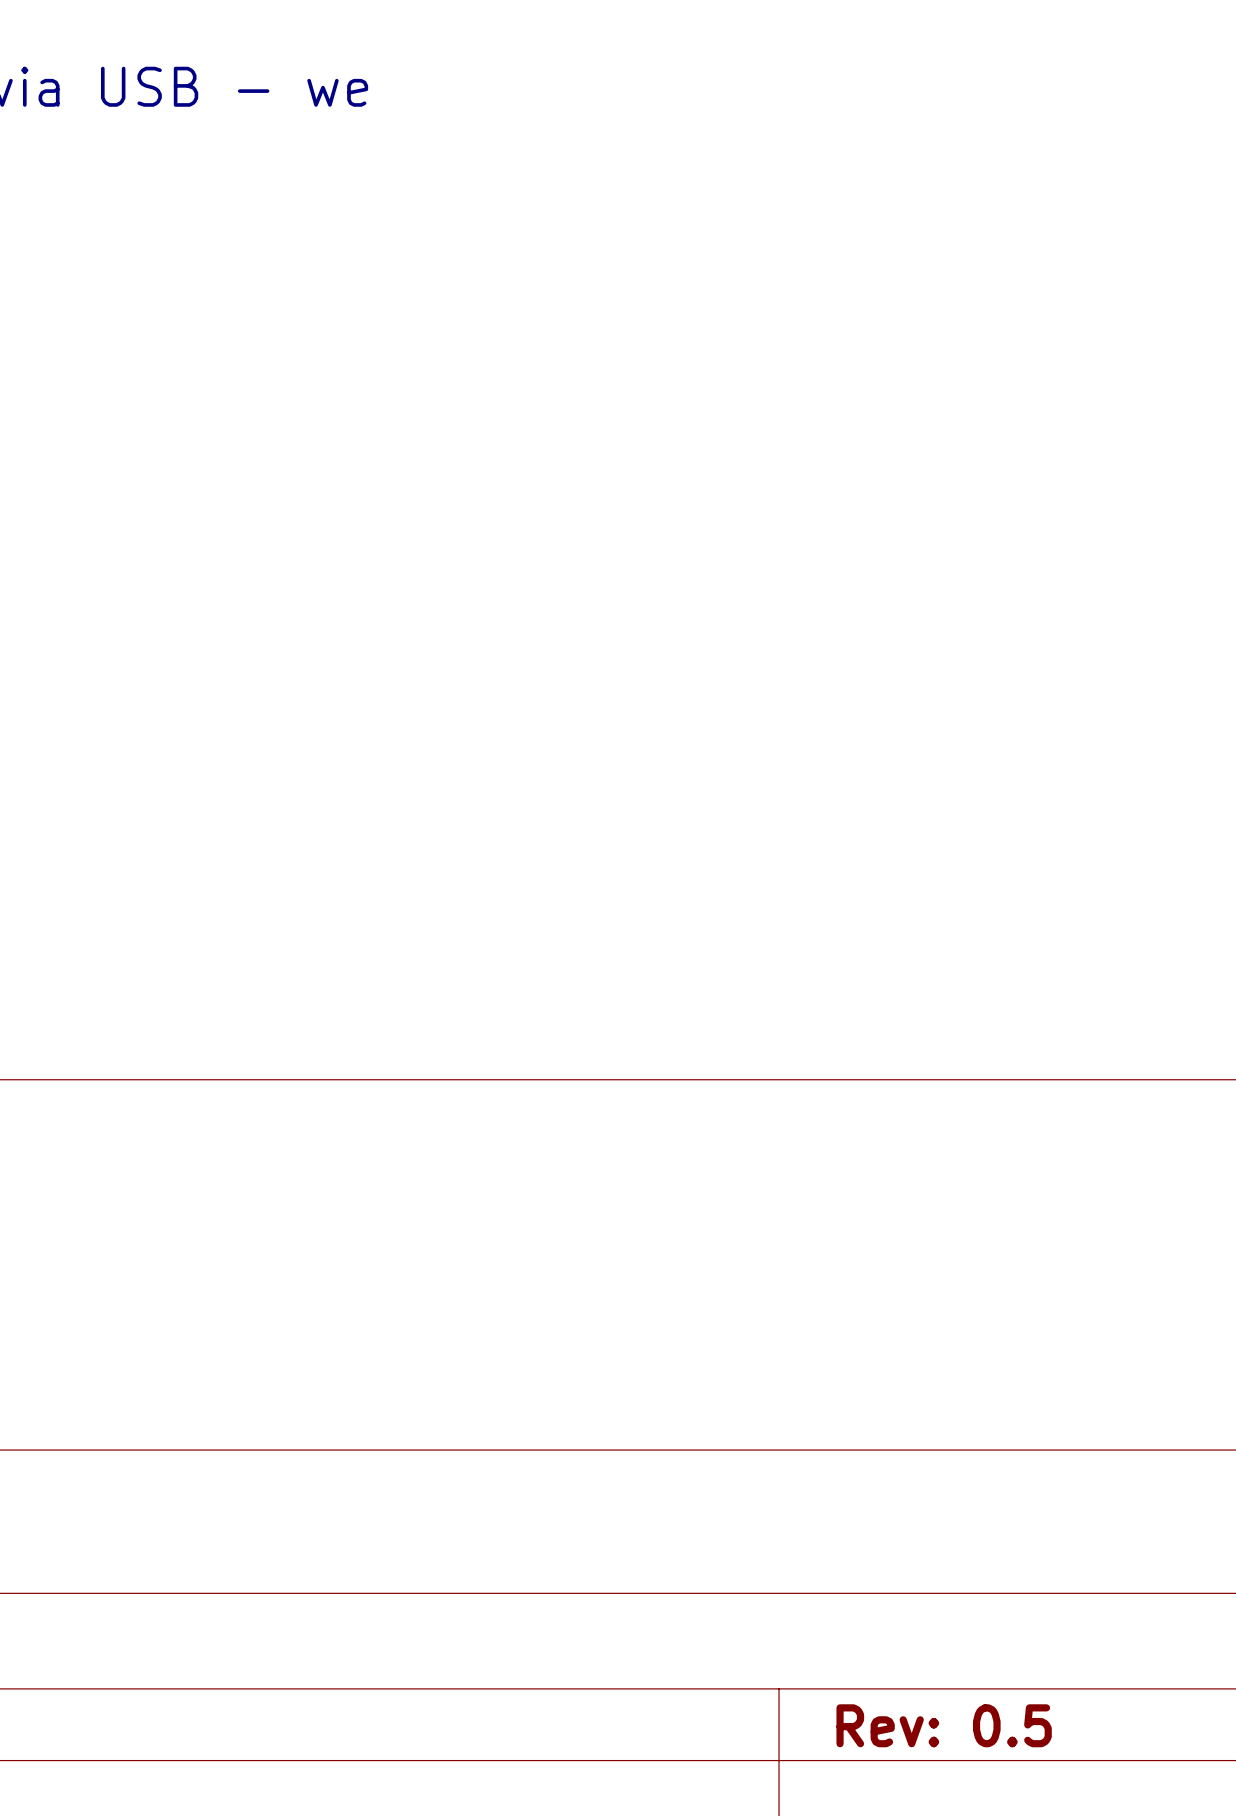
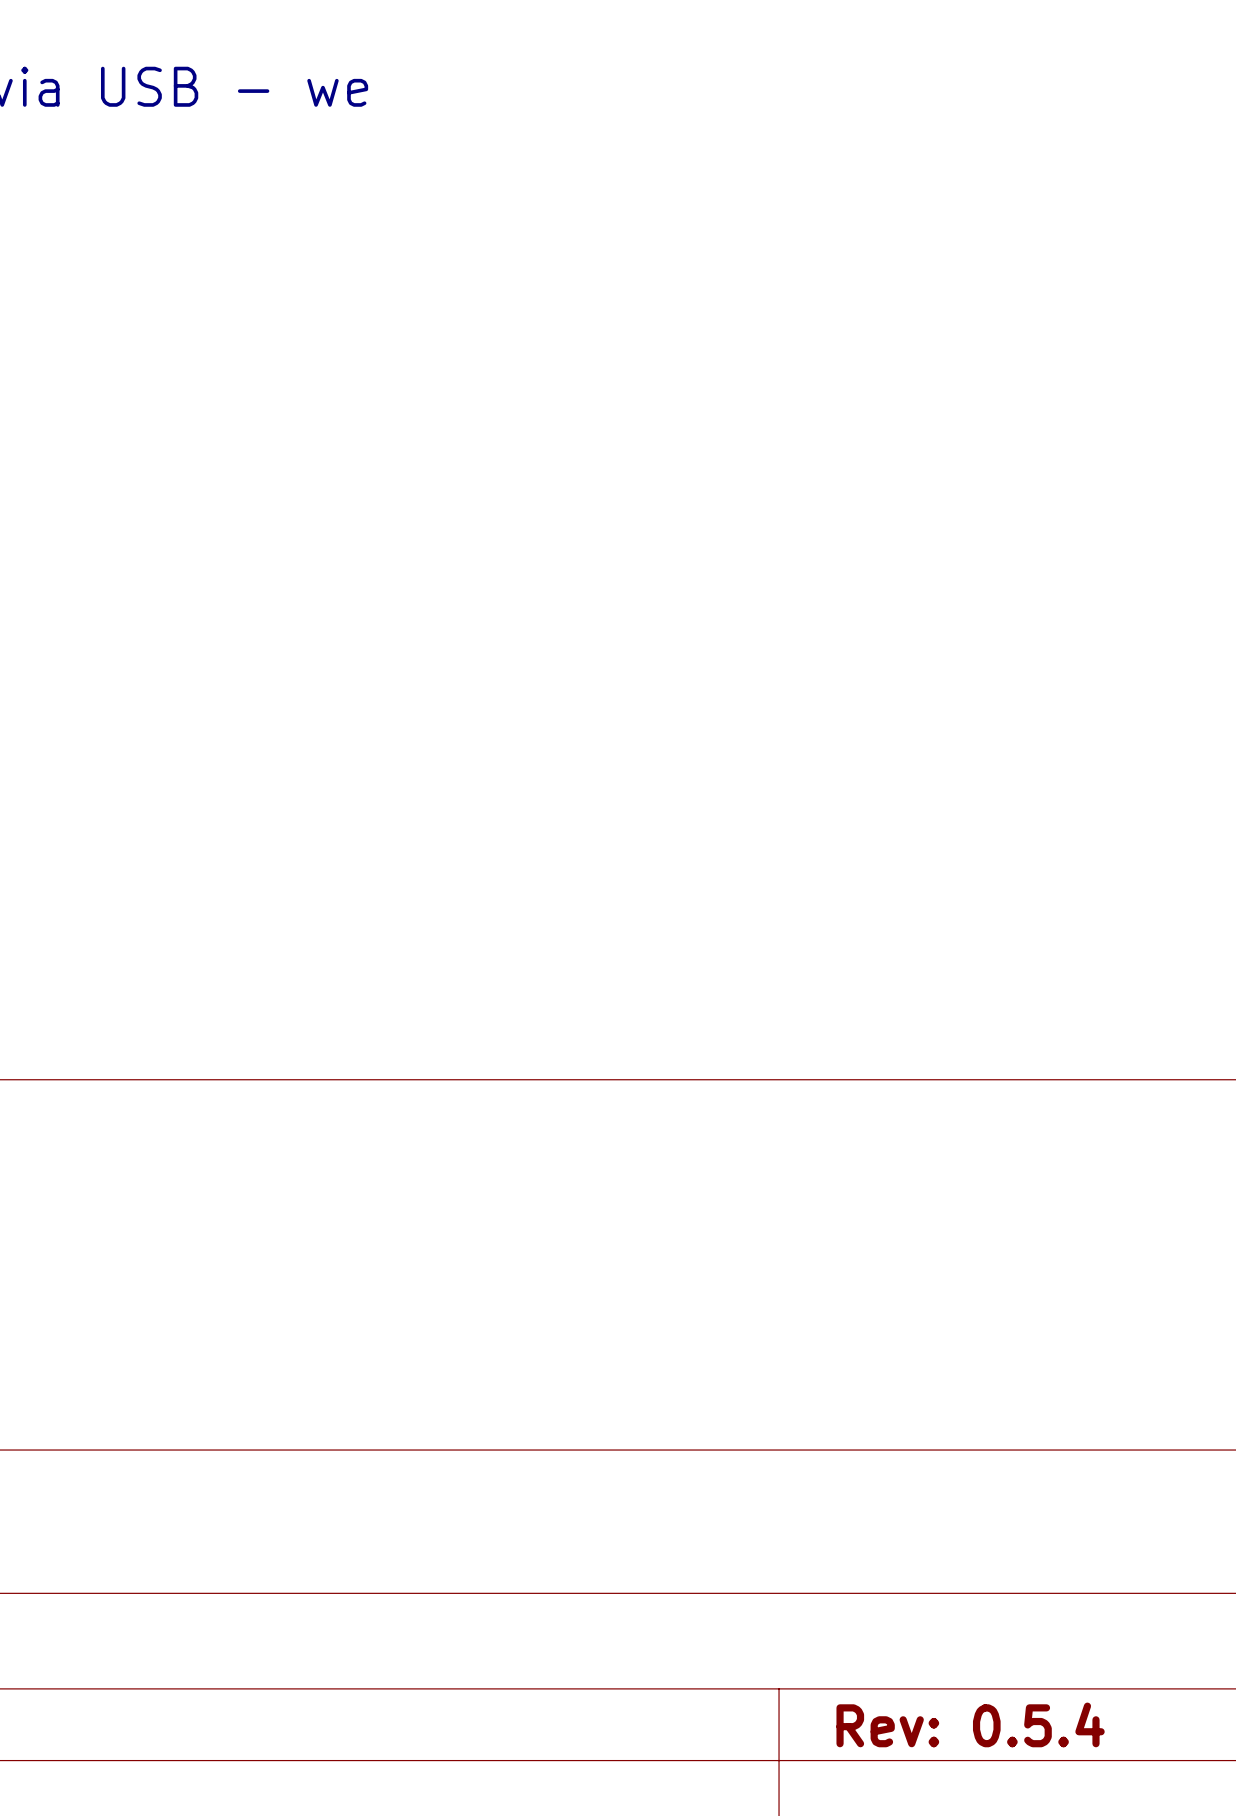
title block: Rev: 0.5 (944, 1725) -> Rev: 0.5.4 (970, 1724)

